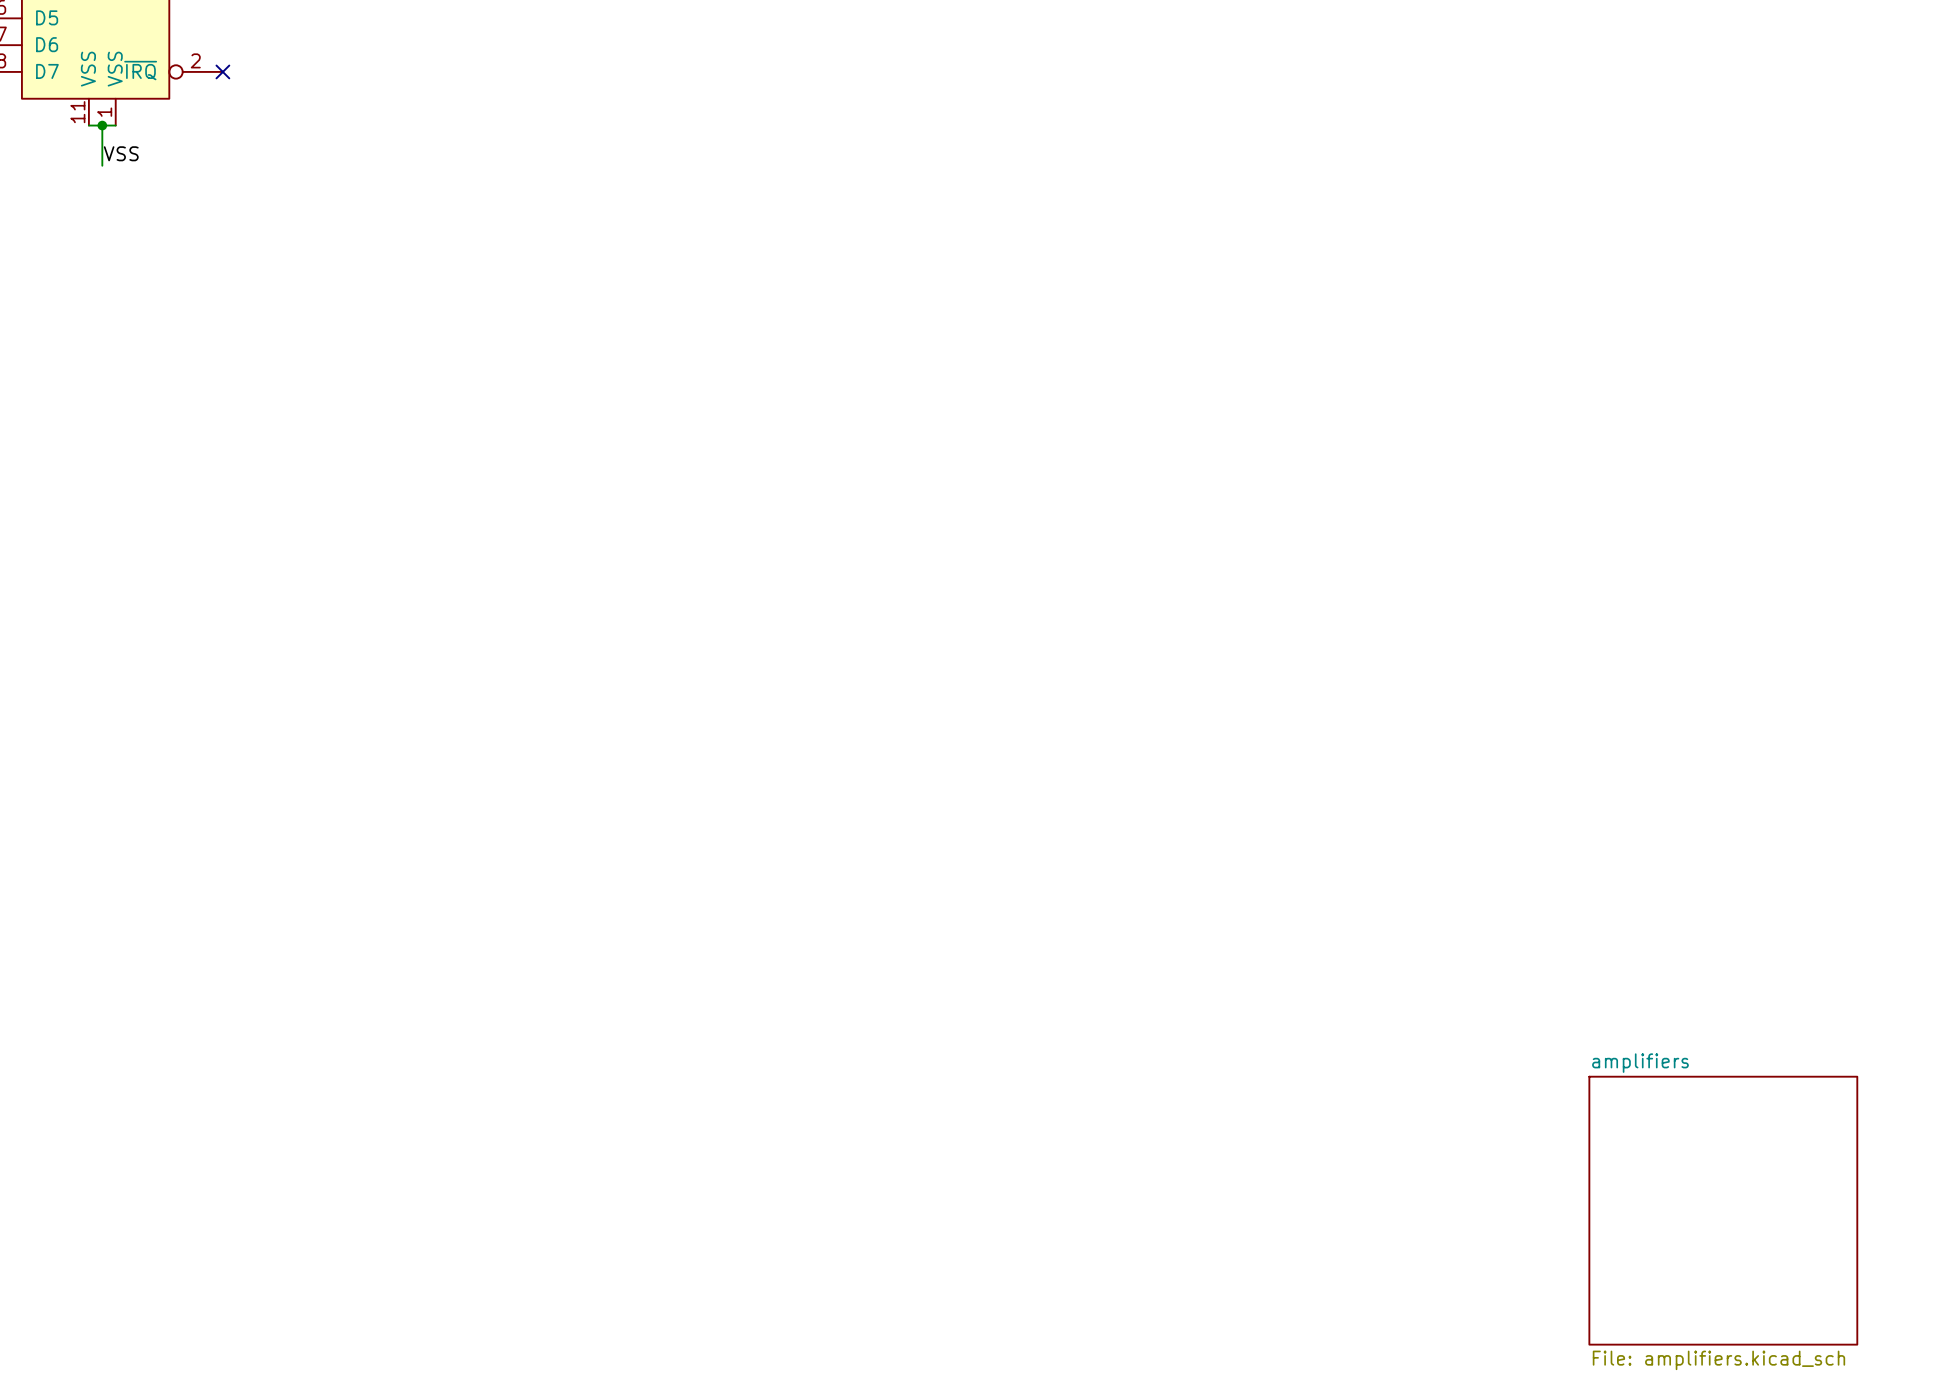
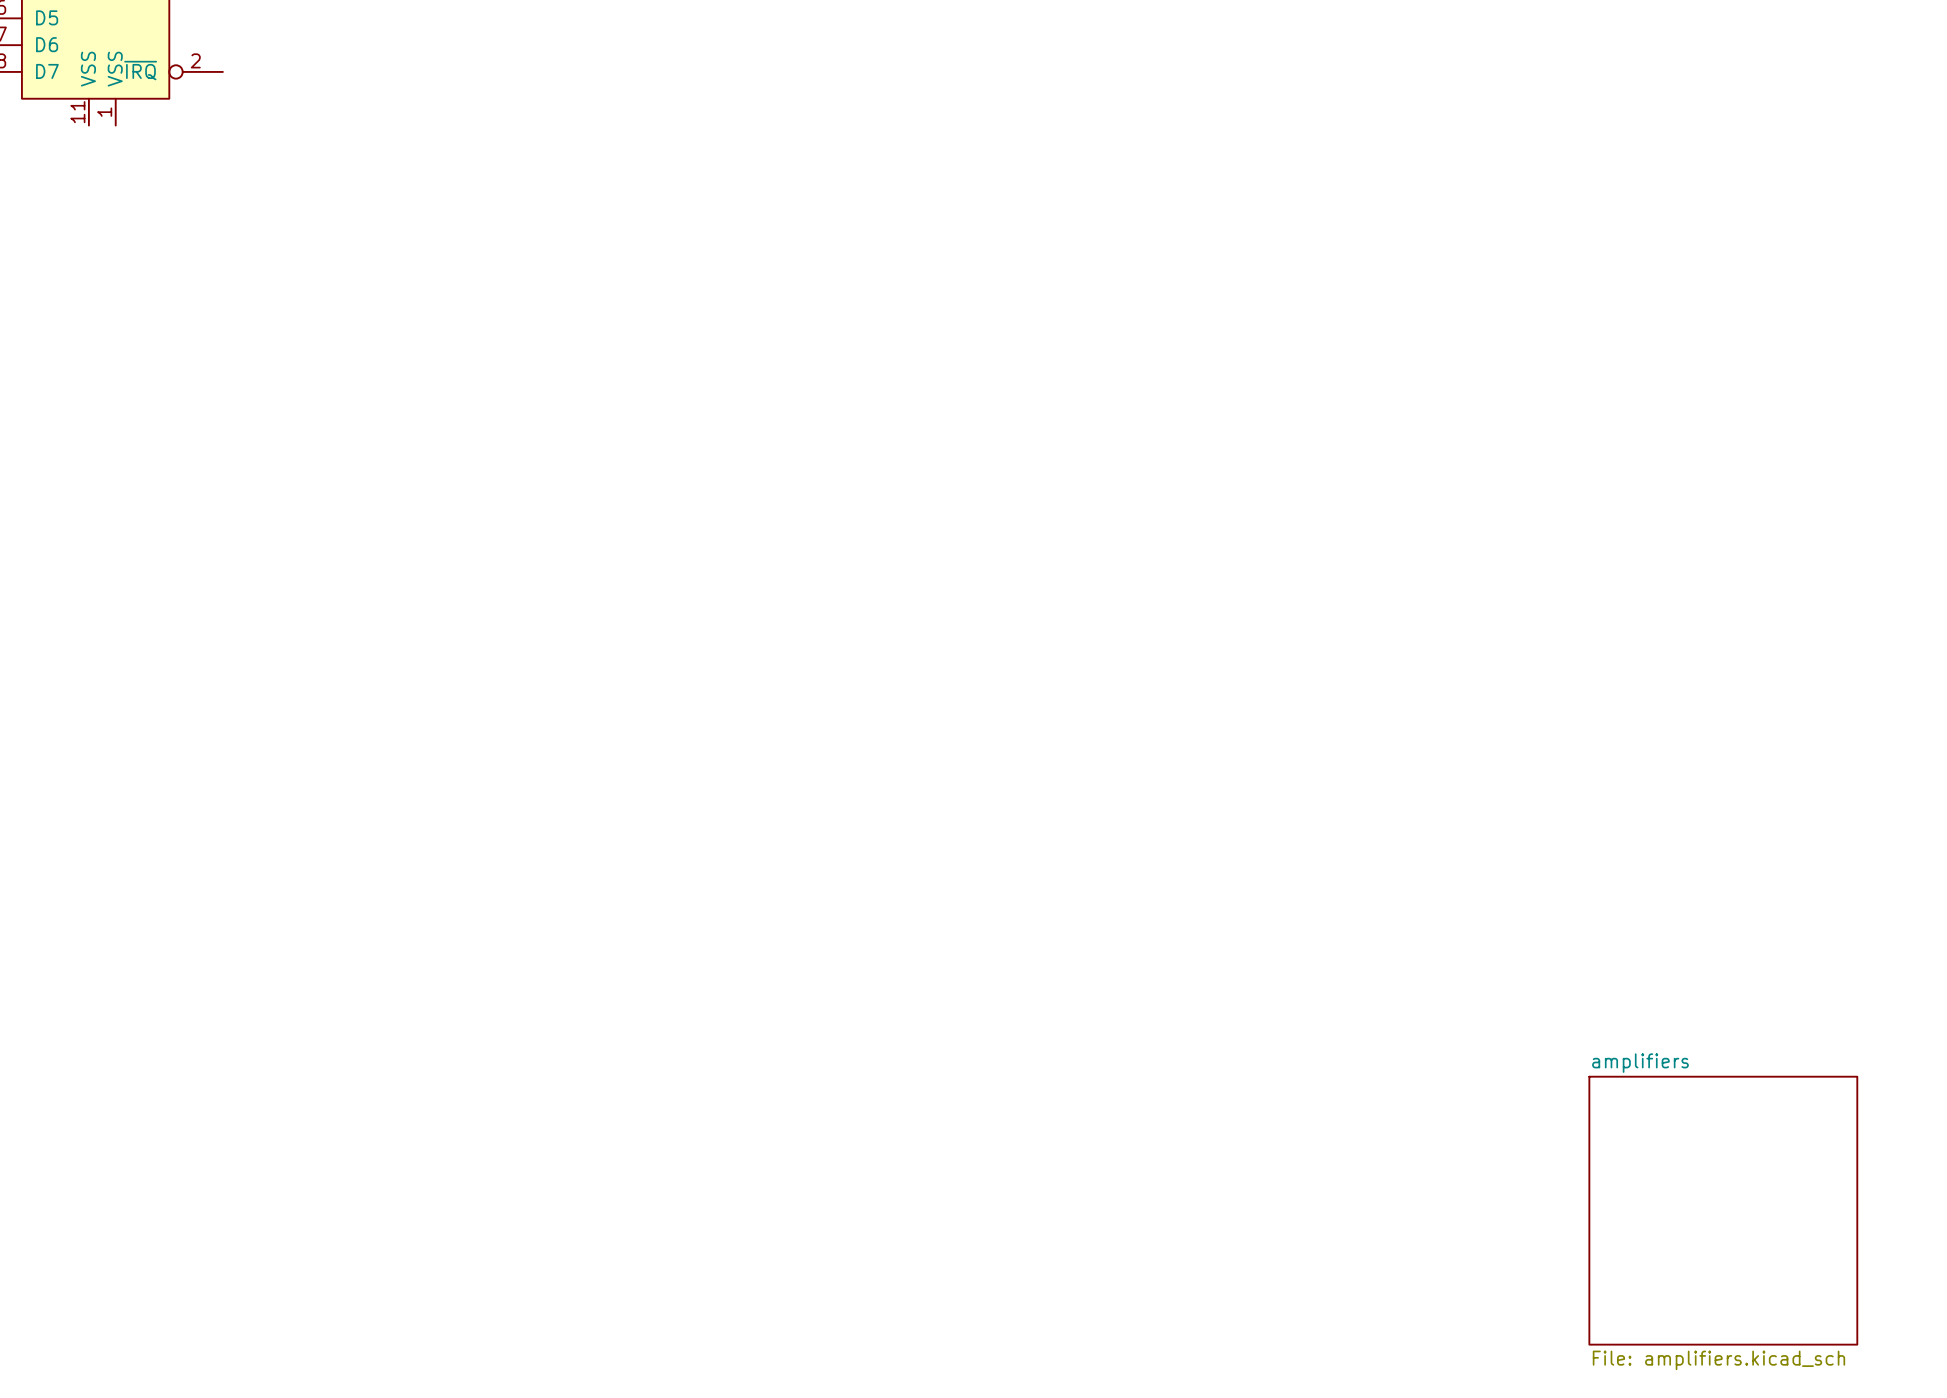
no-connect mark: (222, 71) -> none
wire: (88, 125) (115, 125) -> none
wire: (102, 125) (102, 165) -> none
junction: (102, 125) -> none
label: VSS (121, 153) -> none

